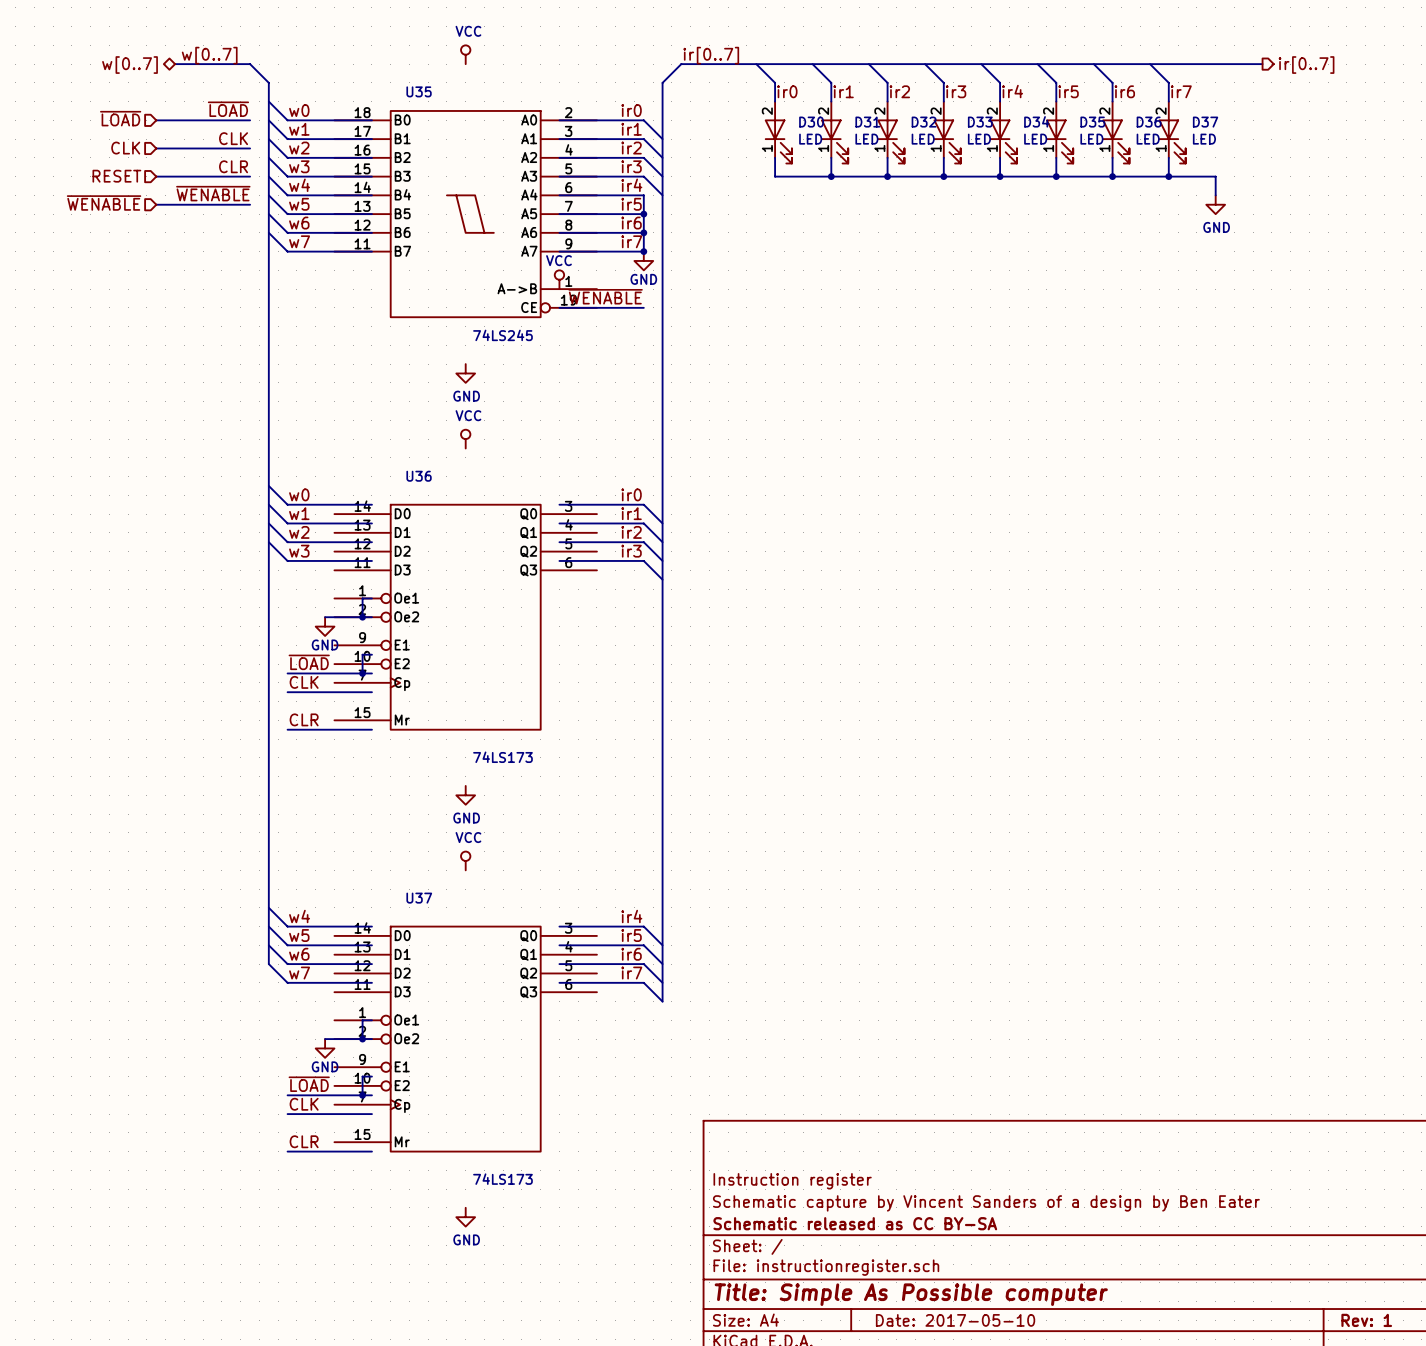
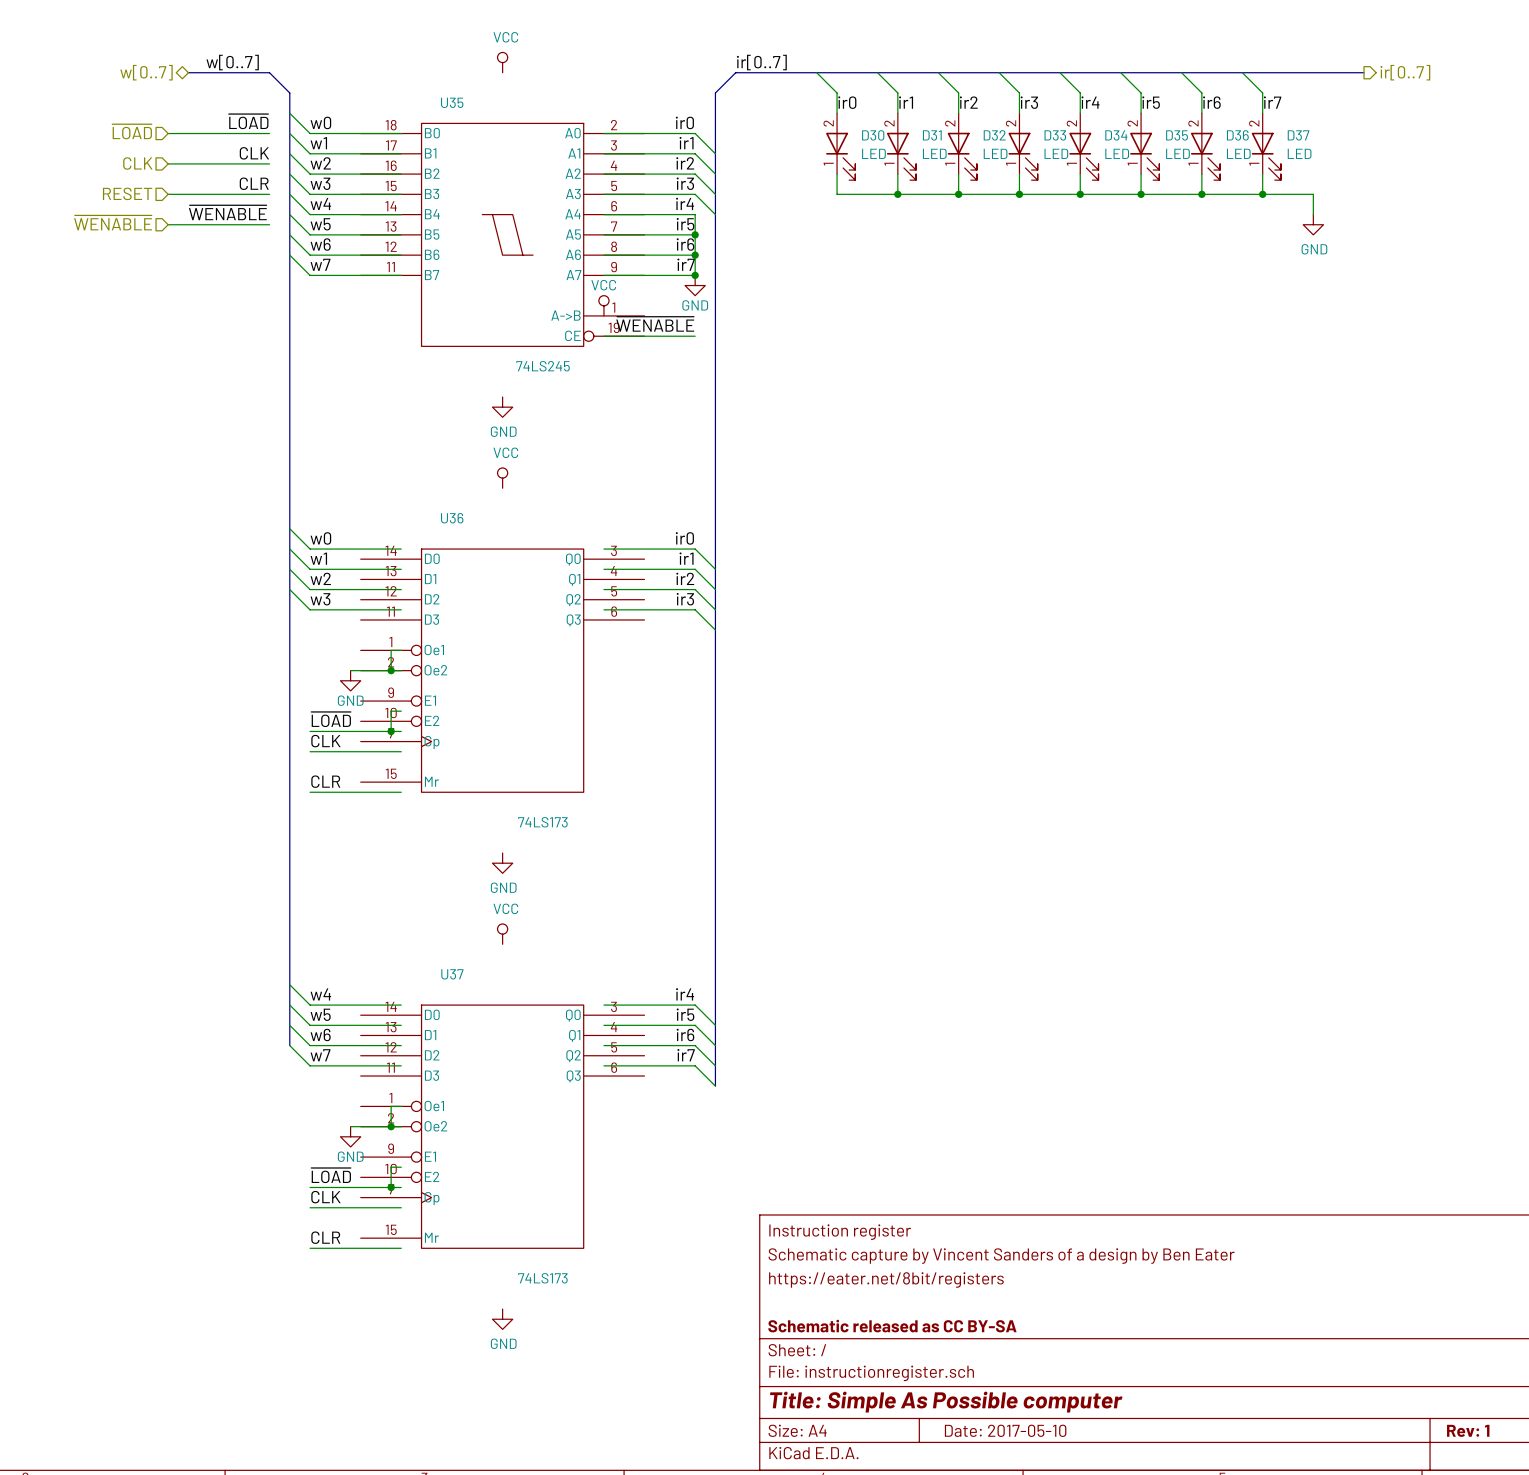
title block: none -> Instruction register (840, 1232)
title block: Instruction register (792, 1181) -> https://eater.net/8bit/registers (886, 1280)
title block position: Schematic capture by Vincent Sanders of a design by Ben Eater (986, 1203) -> Schematic capture by Vincent Sanders of a design by Ben Eater (1001, 1256)

